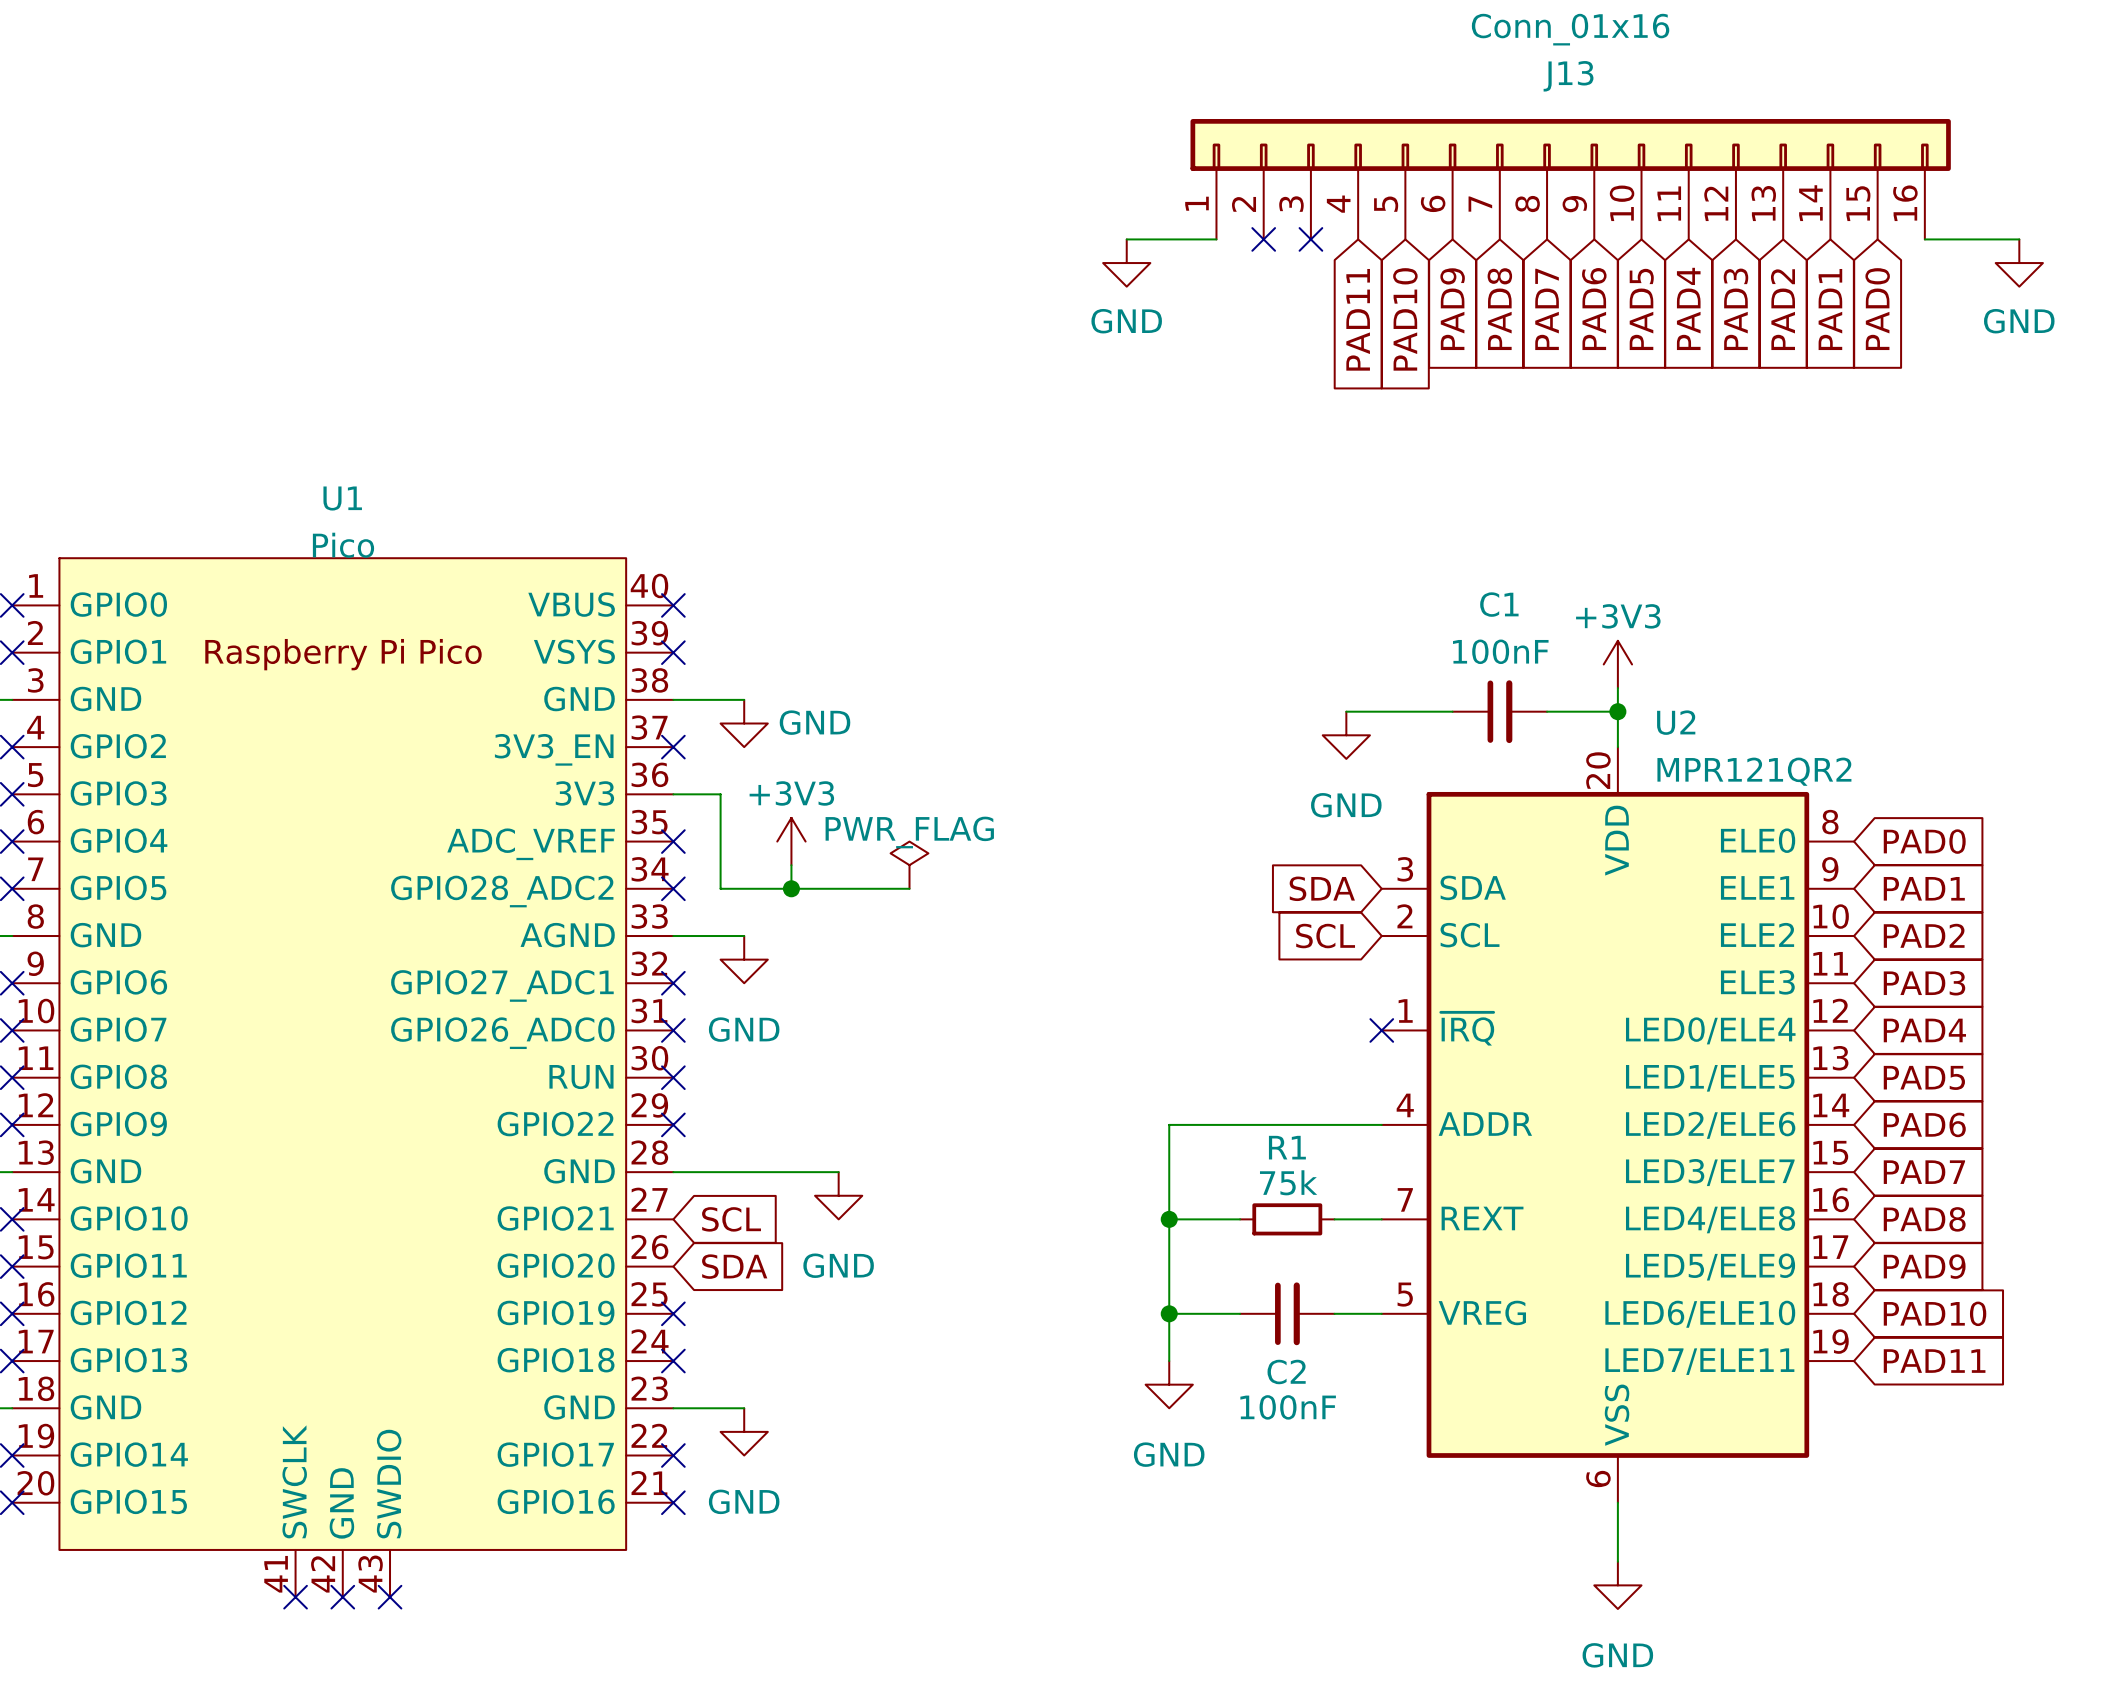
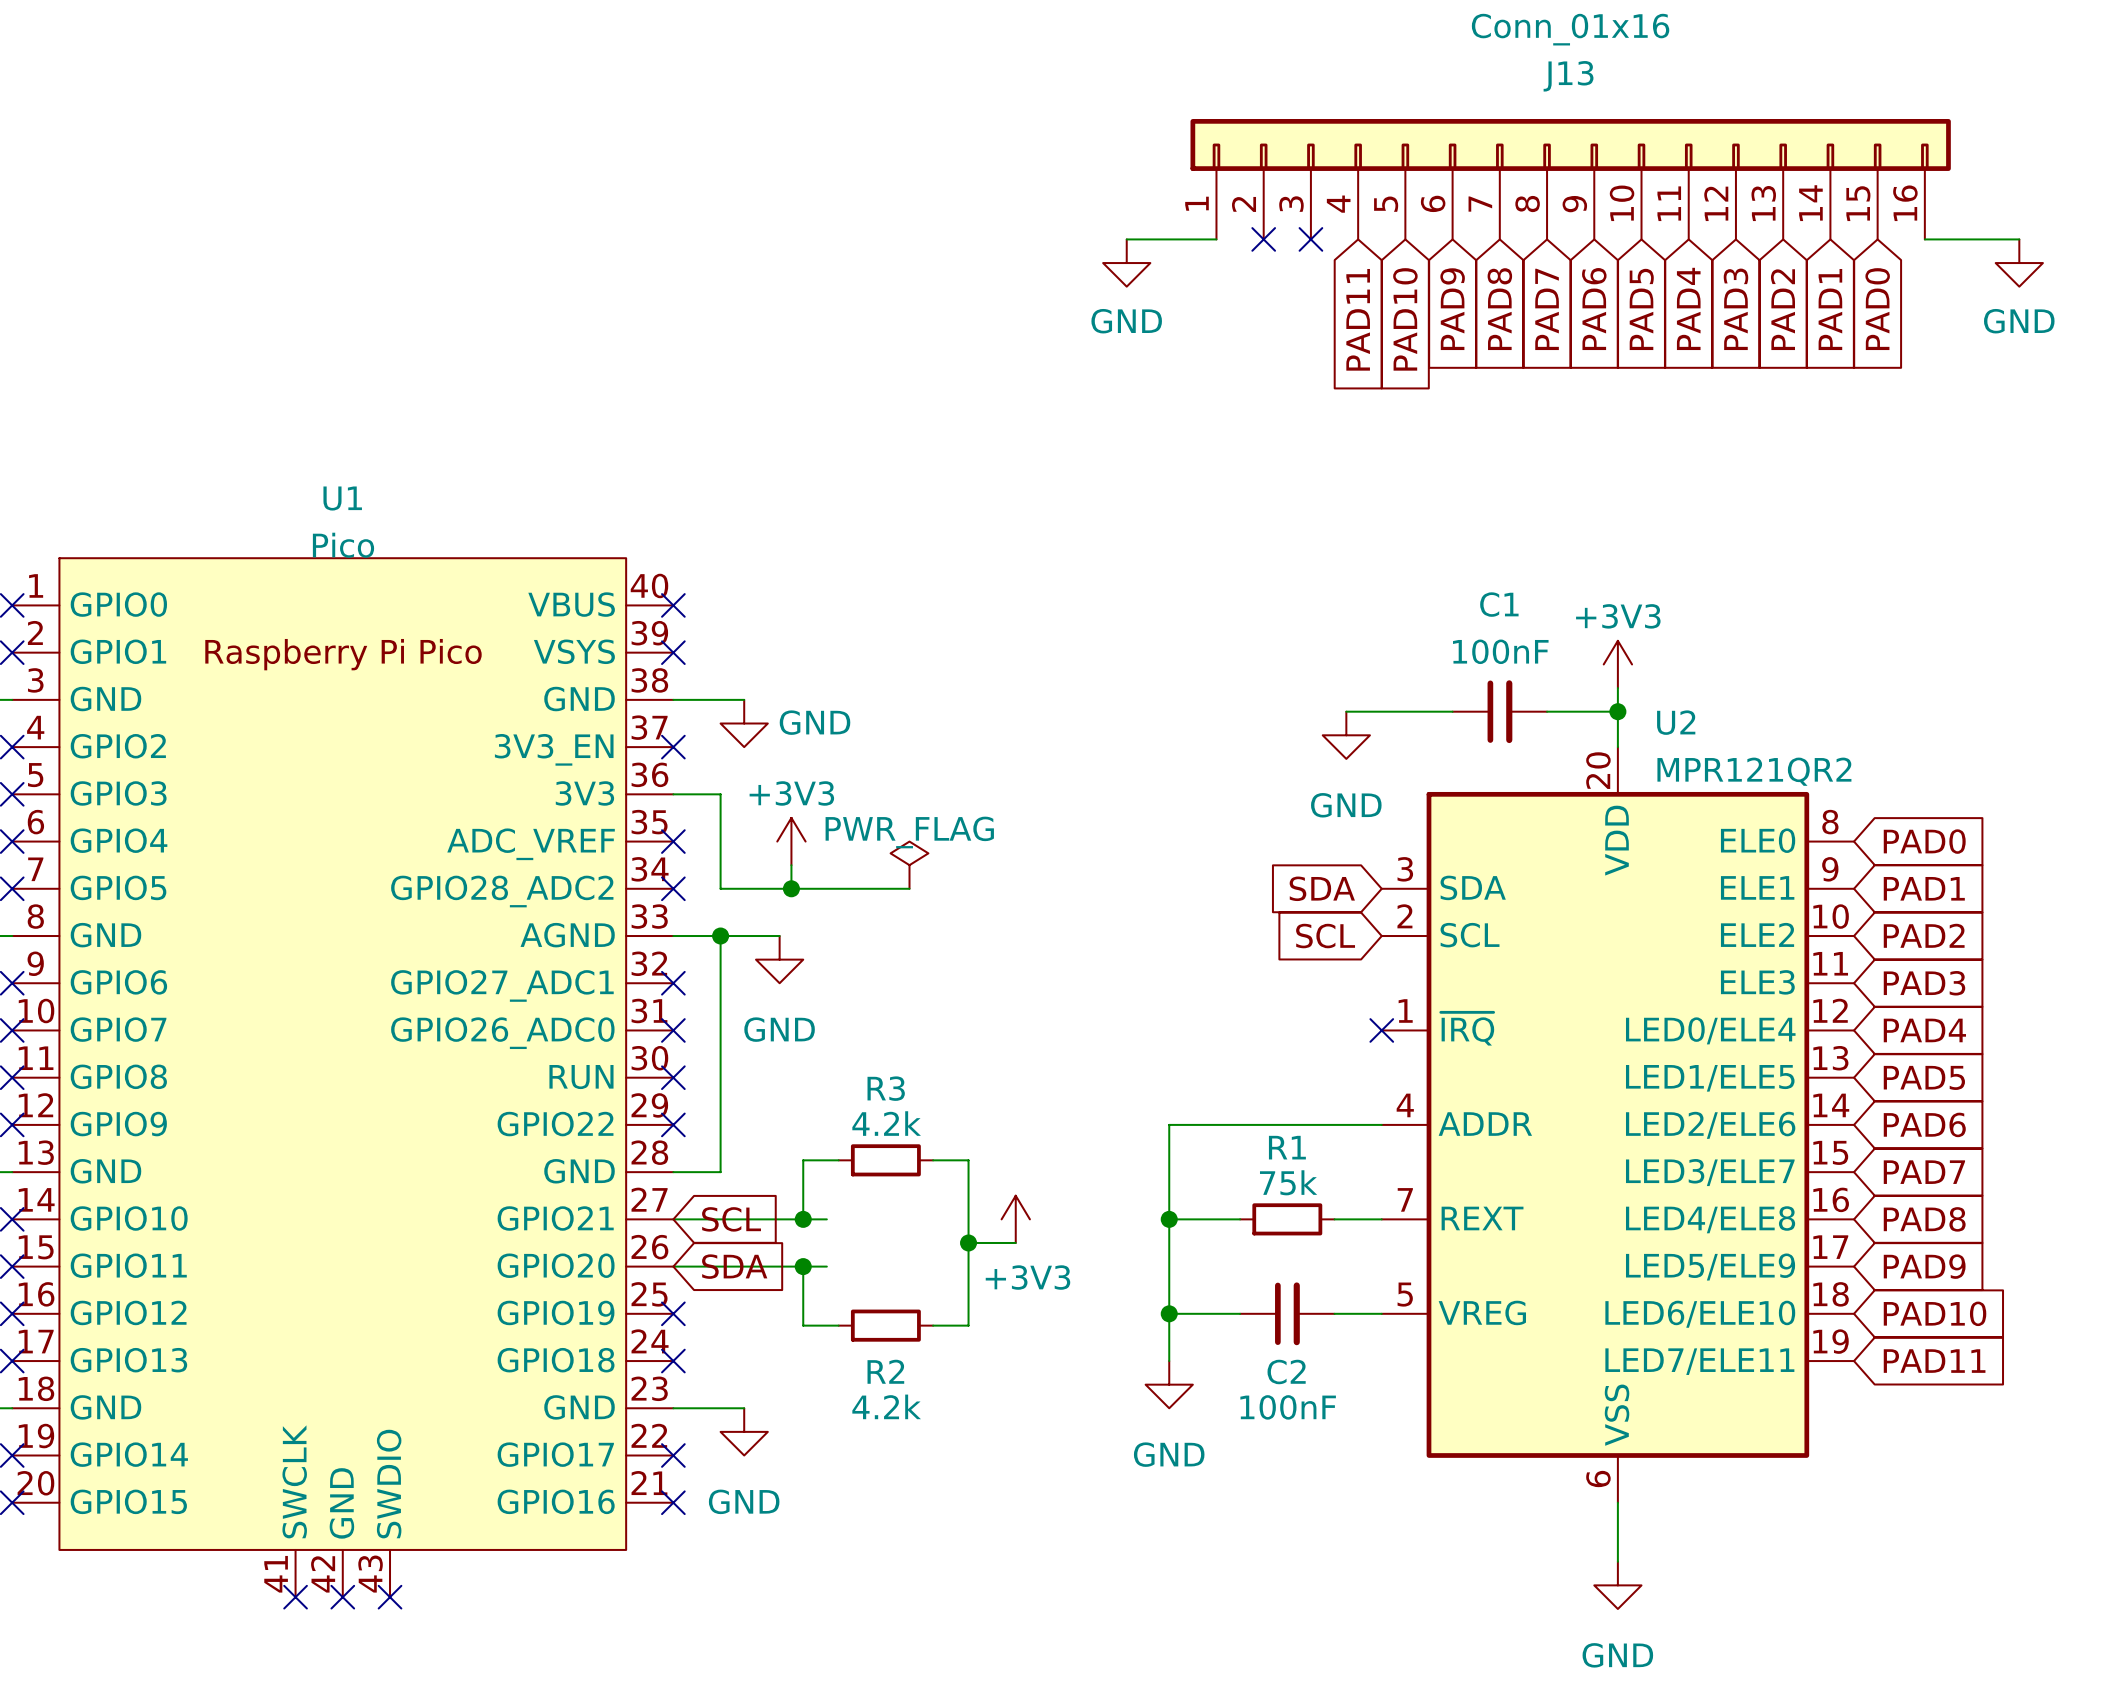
junction: none -> (720, 936)
wire: none -> (744, 936) (779, 936)
power symbol position: GND (744, 959) -> GND (779, 959)
wire: none -> (838, 1160) (803, 1160) (803, 1219)
R3: none -> 4.2k (885, 1160)
wire: none -> (933, 1160) (968, 1160) (968, 1325) (933, 1325)
wire: (720, 1172) (838, 1172) -> (720, 1172) (720, 936)
power symbol: GND (838, 1195) -> none
wire: none -> (673, 1219) (826, 1219)
junction: none -> (803, 1219)
power symbol: none -> +3V3 (1015, 1219)
wire: none -> (968, 1242) (1015, 1242)
junction: none -> (968, 1242)
wire: none -> (673, 1266) (826, 1266)
wire: none -> (803, 1266) (803, 1325) (838, 1325)
junction: none -> (803, 1266)
R2: none -> 4.2k (885, 1325)

